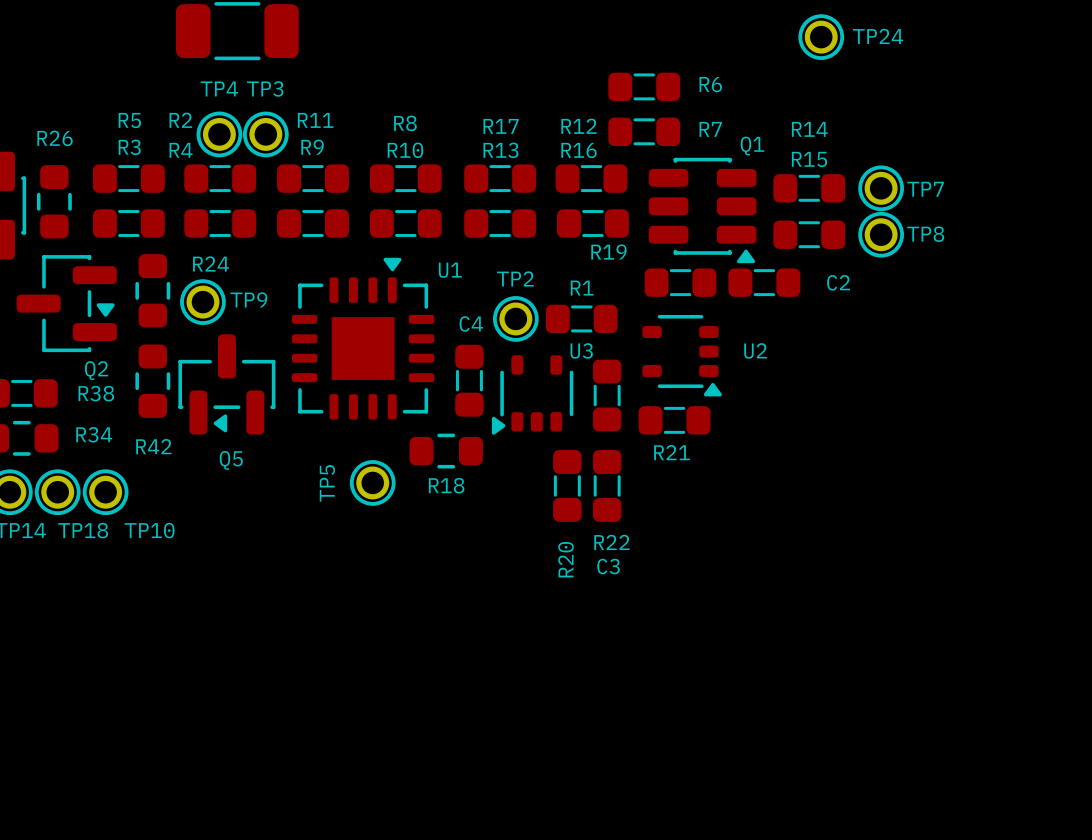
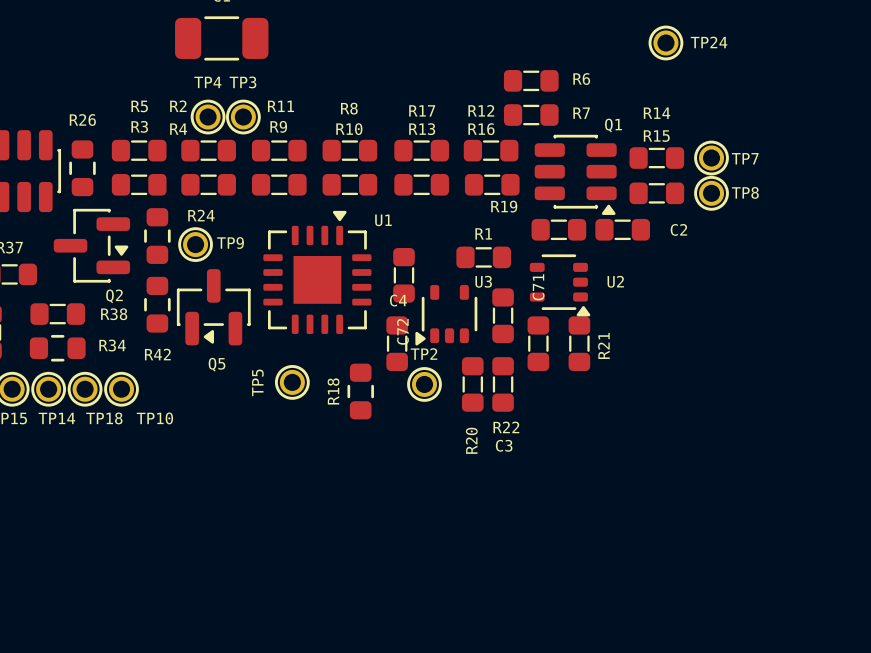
TP2 position: (515, 318) -> (424, 384)
C72: none -> (403, 275)
C4 position: (469, 380) -> (397, 343)
R21 rotation: 0° (674, 420) -> 90° clockwise (579, 343)
C71: none -> (538, 343)
R18 rotation: 0° (446, 451) -> 90° clockwise (360, 391)
R18 position: (446, 451) -> (360, 391)
TP5 position: (372, 482) -> (292, 382)

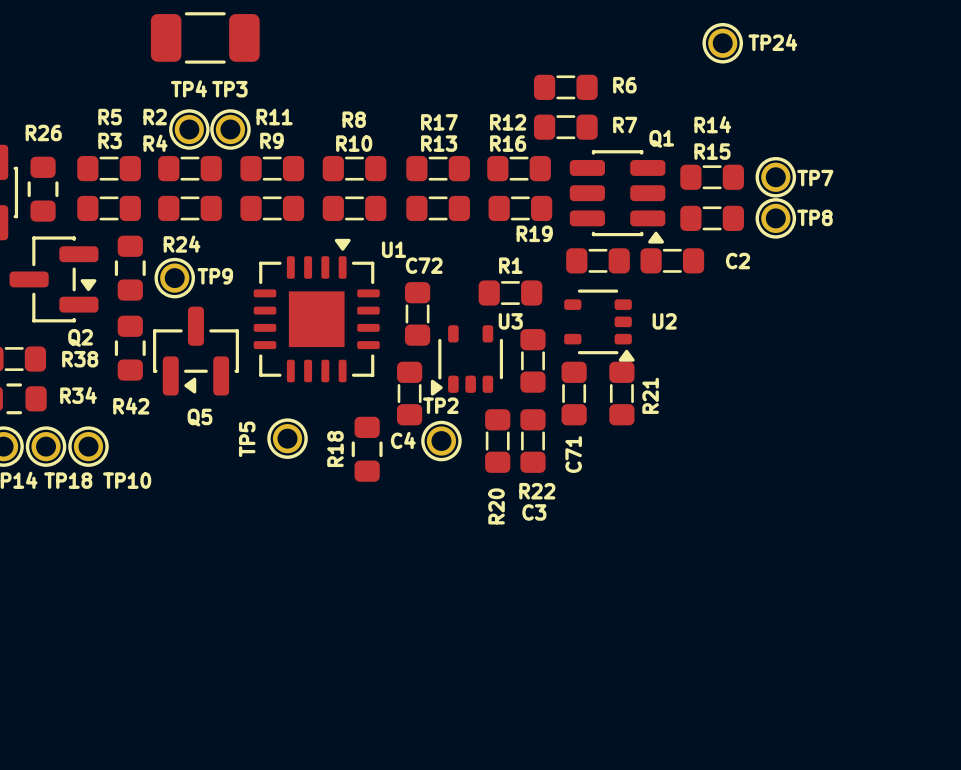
C71 name position: C71 (538, 287) -> C71 (573, 454)
C4 name position: C4 (398, 300) -> C4 (403, 440)
C72 name rotation: 0° (403, 331) -> 90° clockwise (424, 265)
C72 name position: C72 (403, 331) -> C72 (424, 265)

